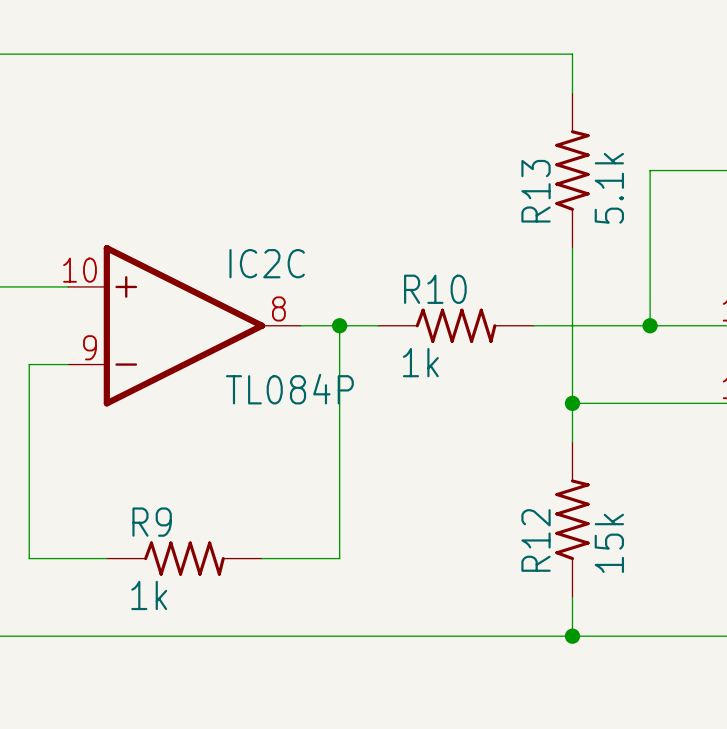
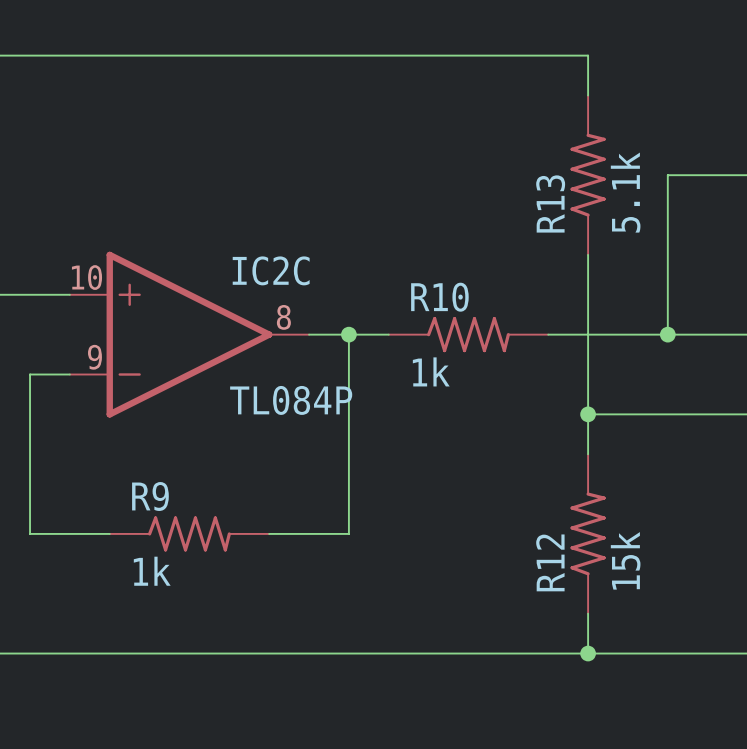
wire: (29, 519) (29, 558) (106, 558) -> (30, 533) (109, 533)
wire: (339, 519) (339, 558) (262, 558) -> (348, 533) (269, 533)
R9 position: (184, 558) -> (189, 533)

